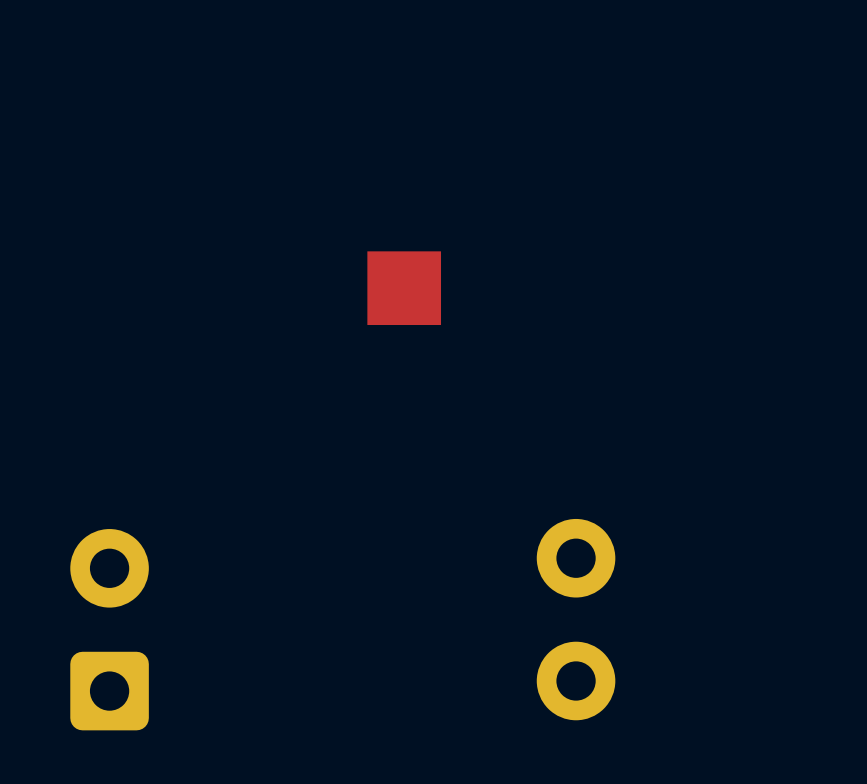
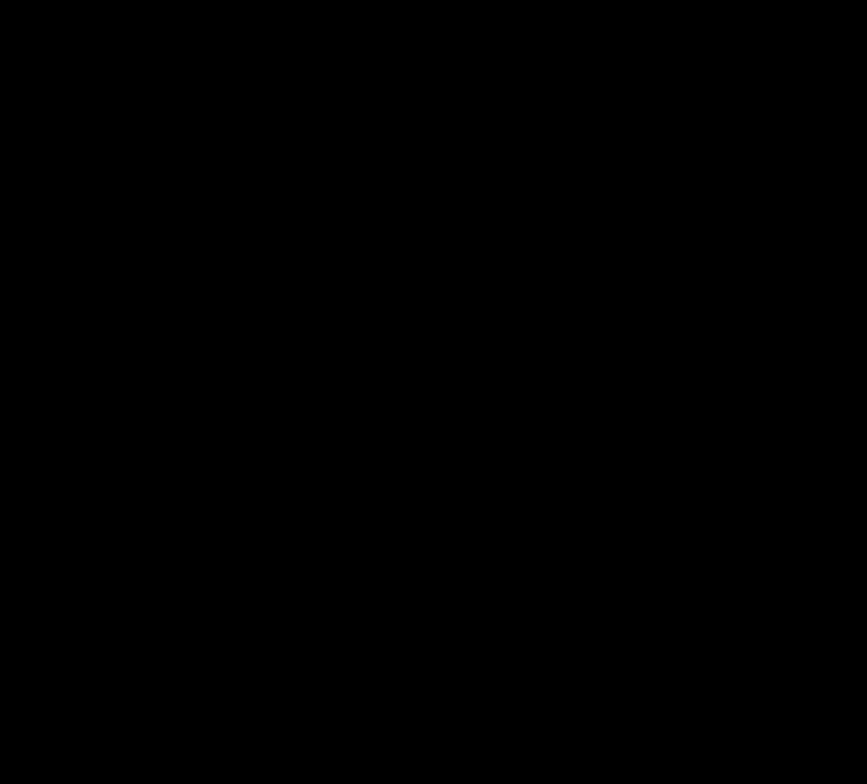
part: (404, 288) -> none
part: (576, 619) -> none
part: (109, 629) -> none

